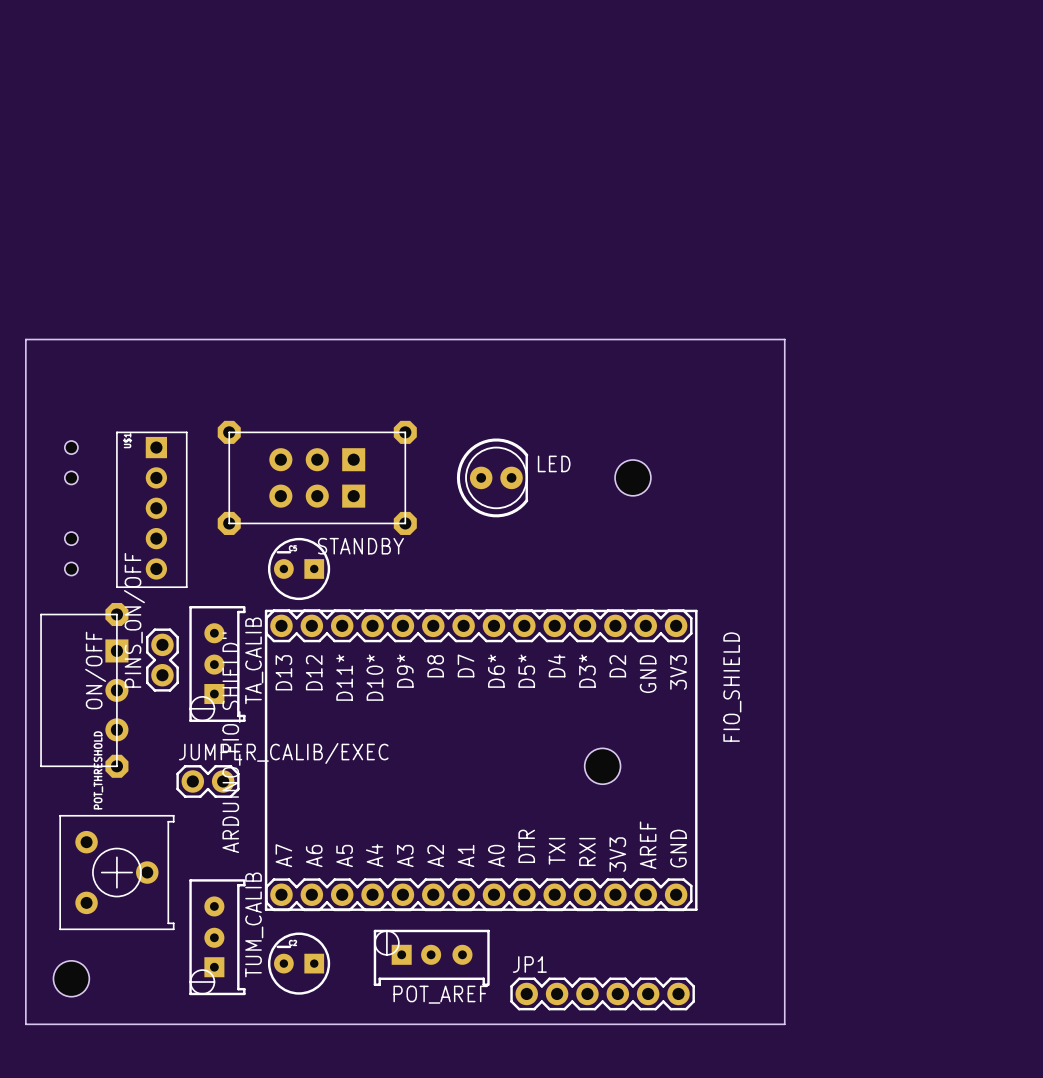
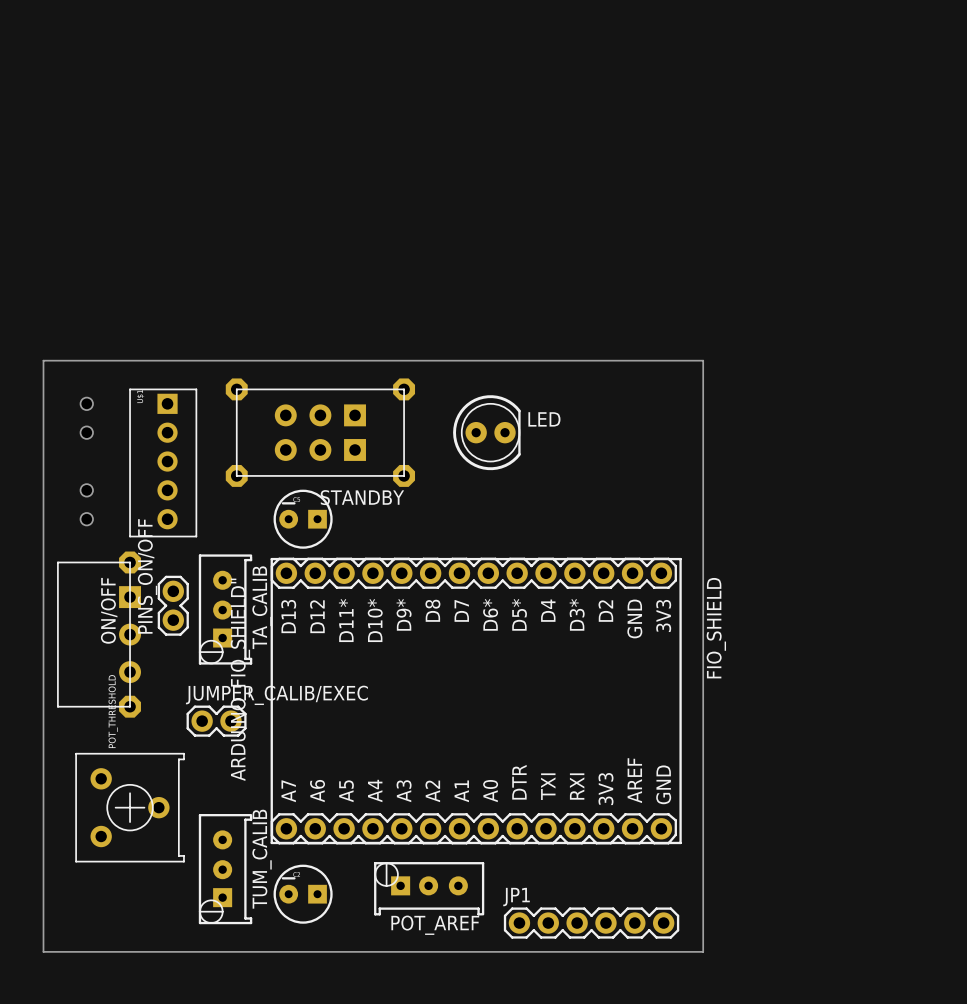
board edge: (25, 402) (25, 339) (784, 339) (784, 1024) (720, 1024) -> (43, 360) (703, 360) (703, 951)
hole: (632, 477) -> none
hole: (602, 766) -> none
hole: (71, 978) -> none

